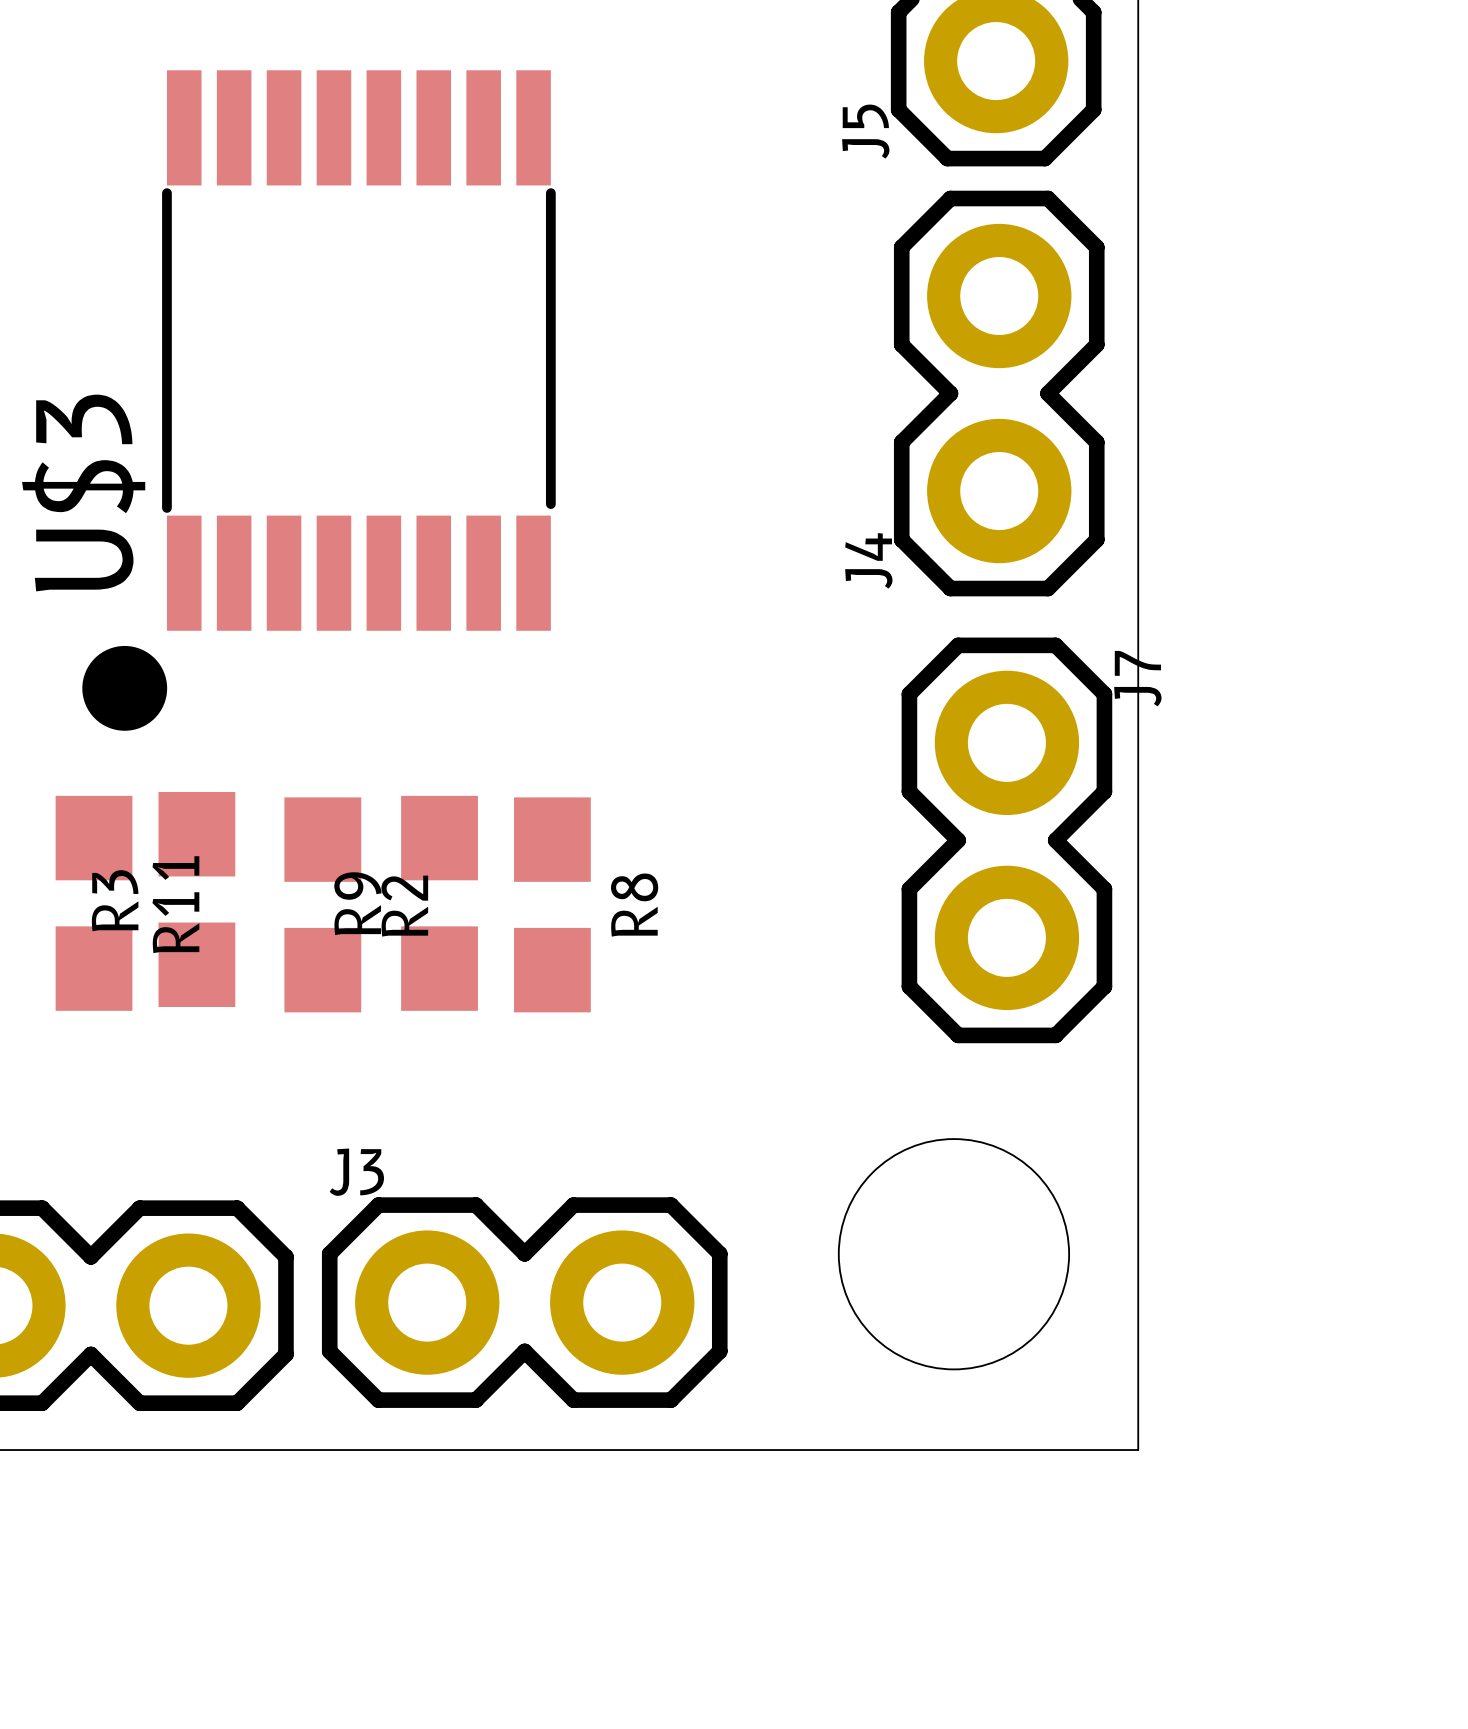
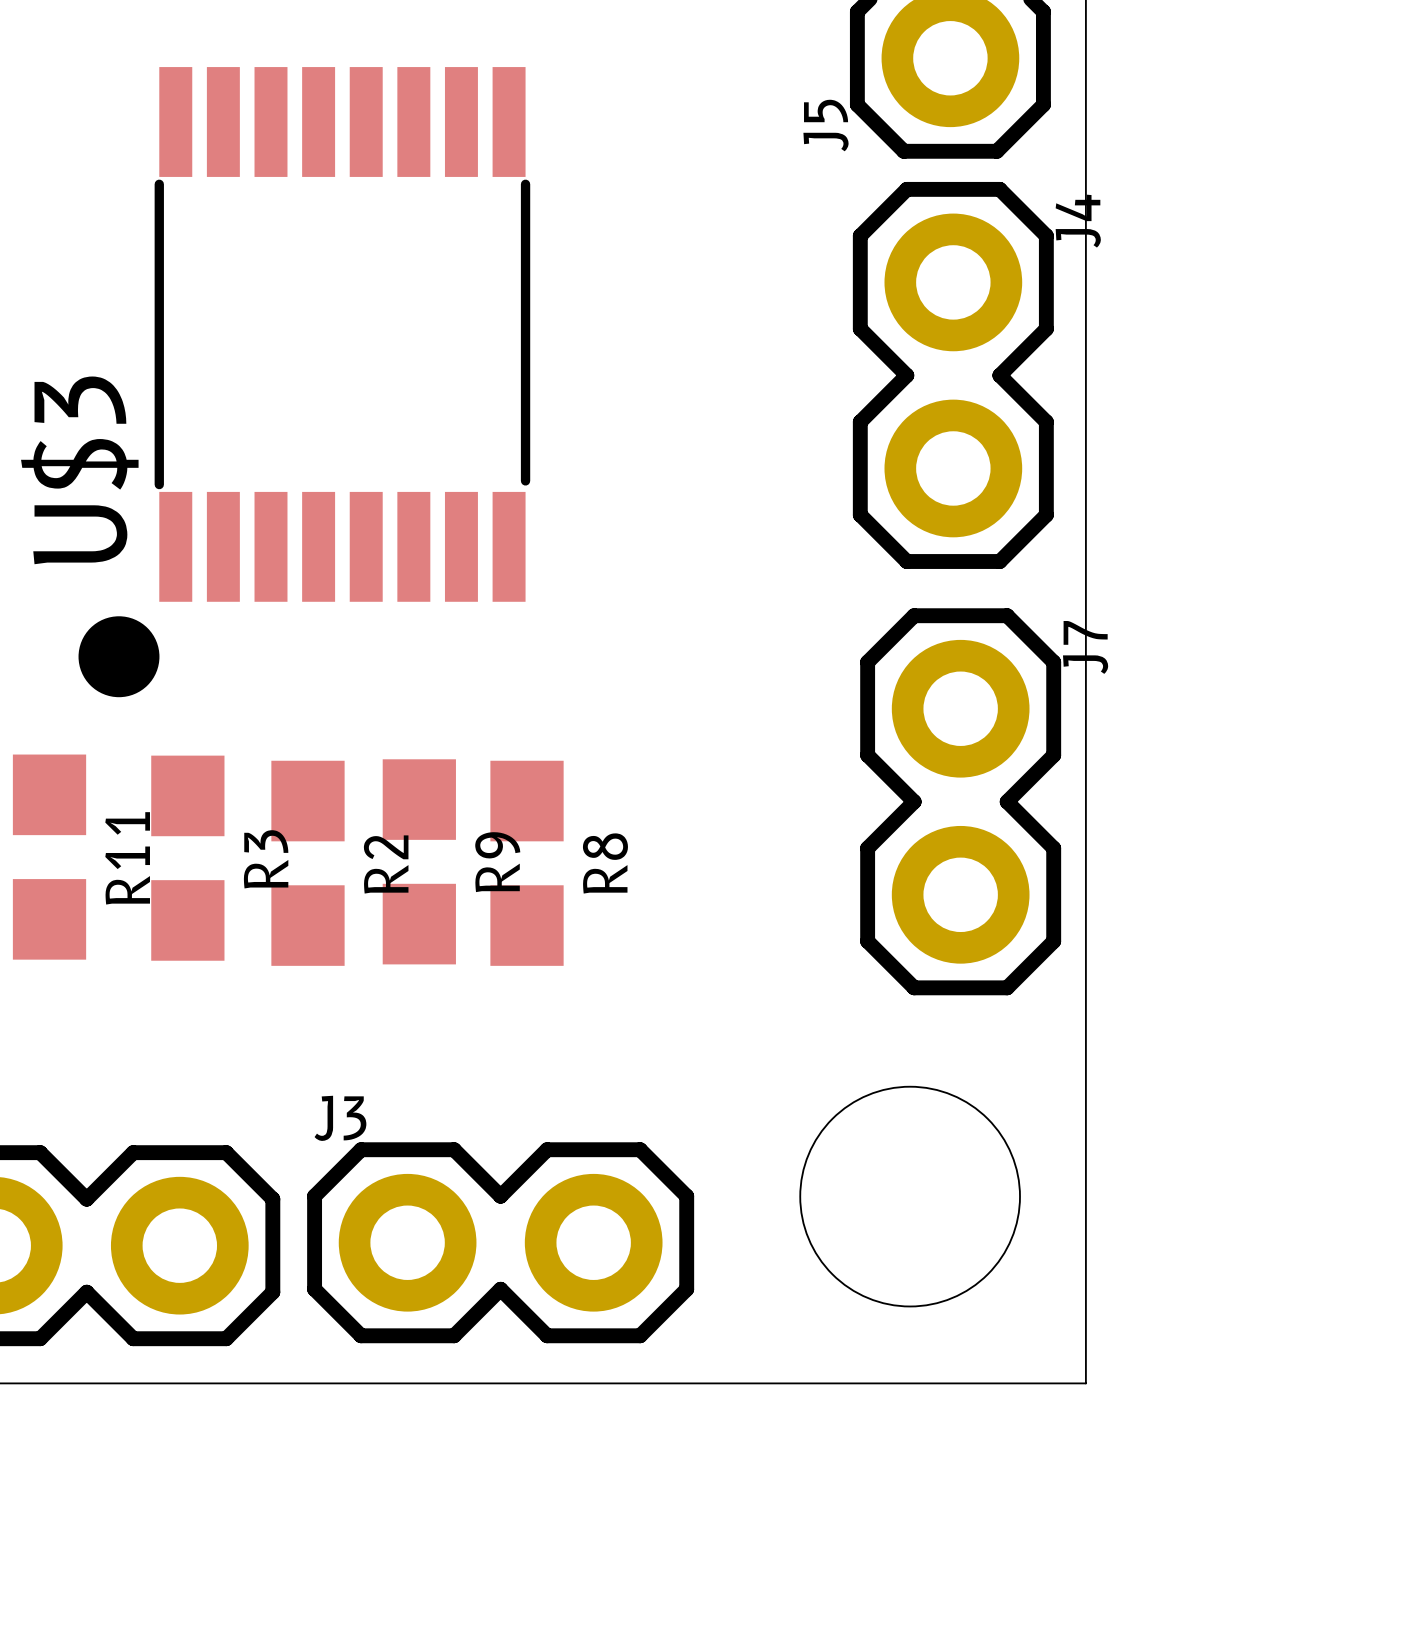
J4 name position: J4 (868, 560) -> J4 (1078, 221)
R3 name position: R3 (115, 900) -> R3 (266, 859)
R11 position: (94, 903) -> (49, 857)
R9 name position: R9 (357, 903) -> R9 (497, 862)

